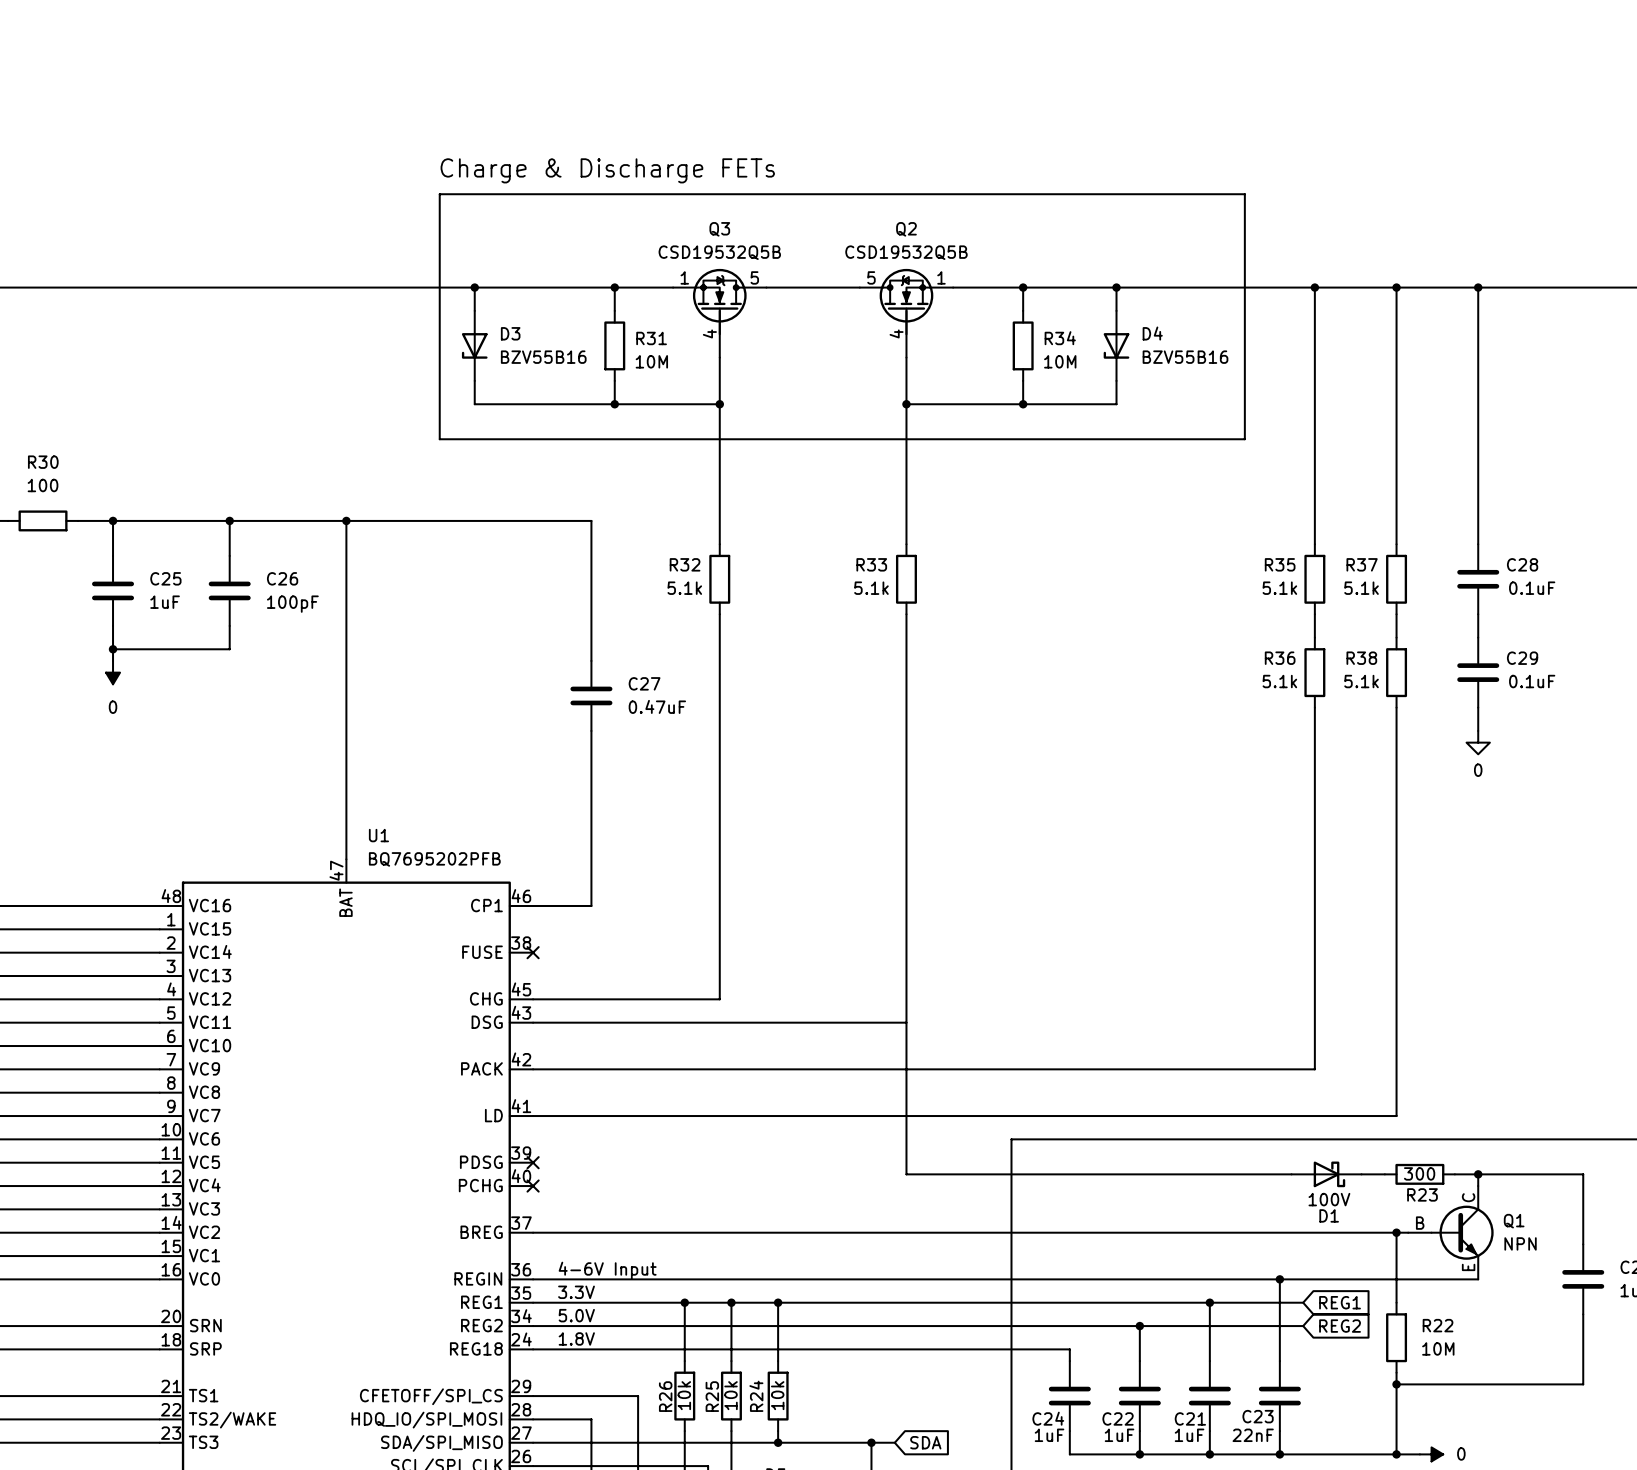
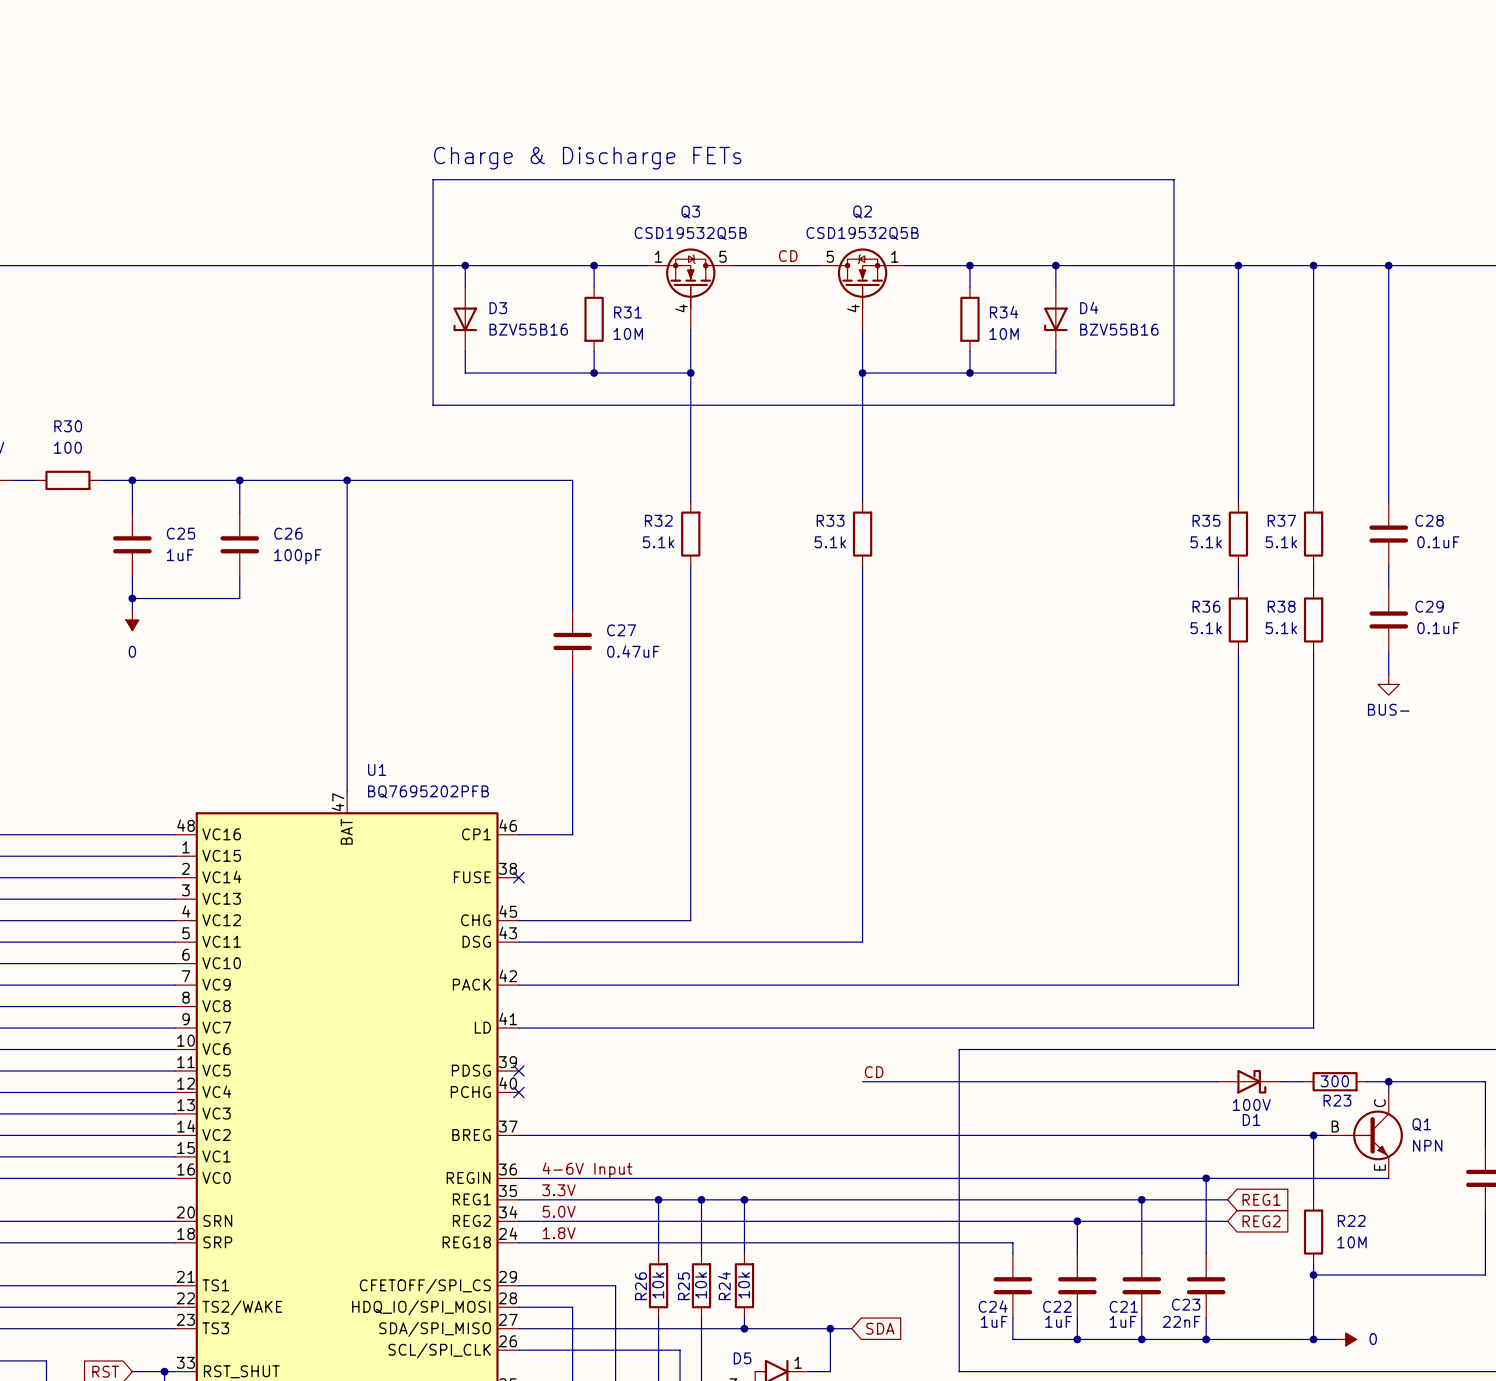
label: none -> CD (788, 256)
power symbol: 0 (1478, 742) -> BUS- (1388, 684)
wire: (906, 1022) (906, 1174) -> none
label: none -> CD (874, 1072)

